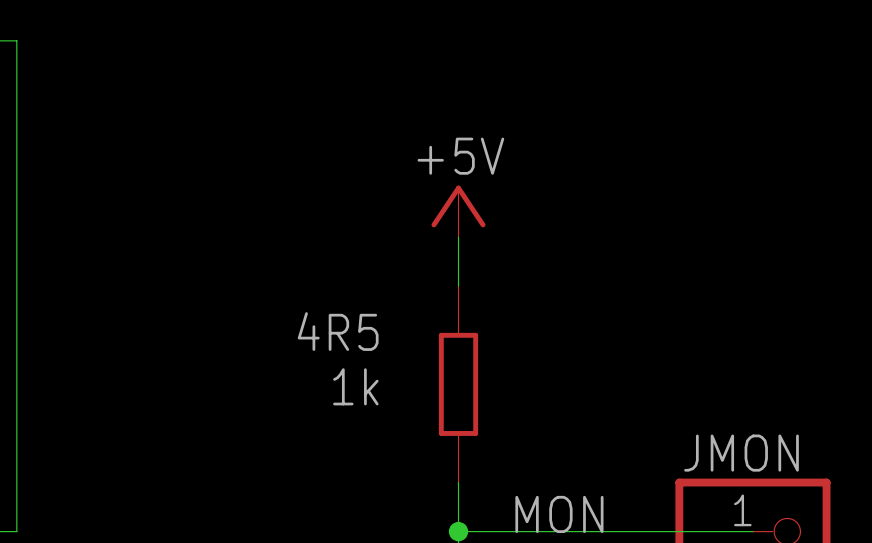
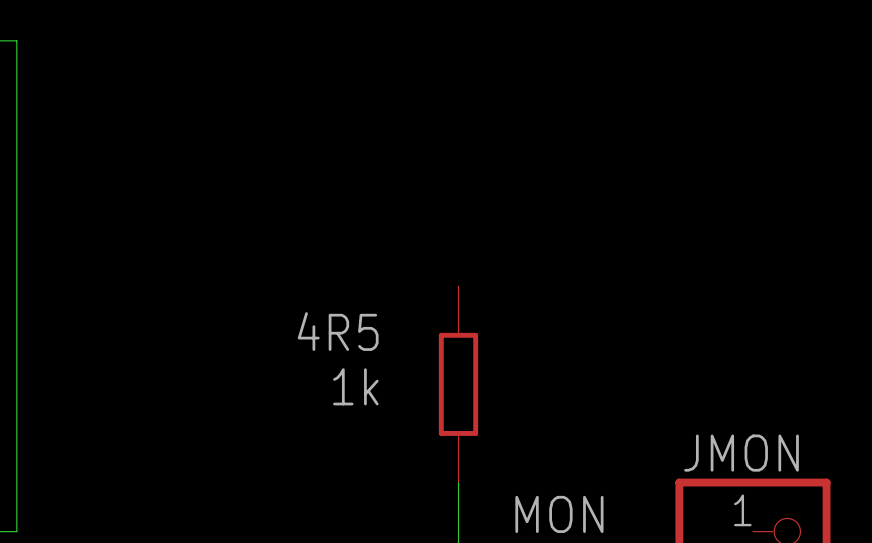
power symbol: +5V (458, 211) -> none
wire: (458, 237) (458, 286) -> none
wire: (458, 531) (752, 531) -> none
junction: (458, 531) -> none

